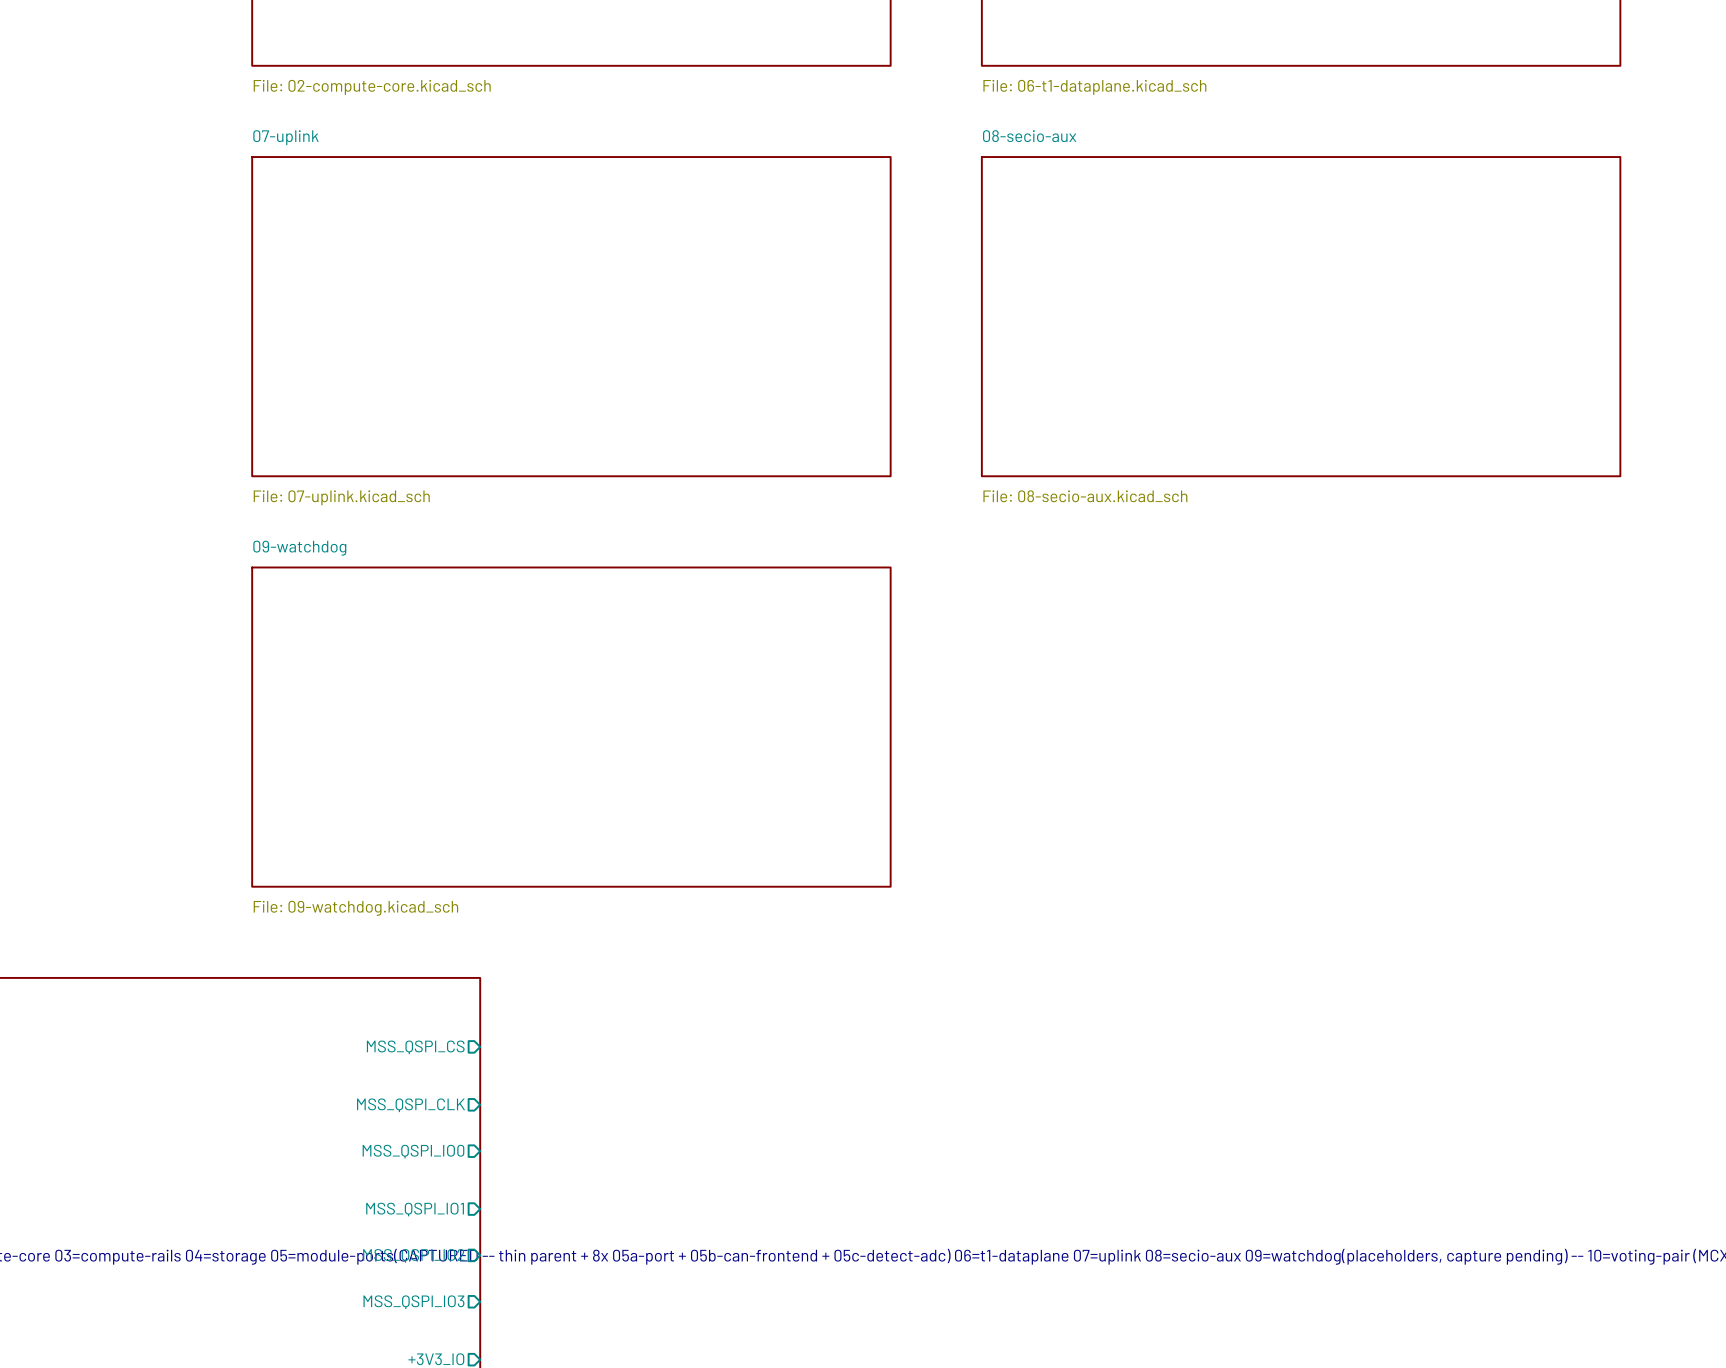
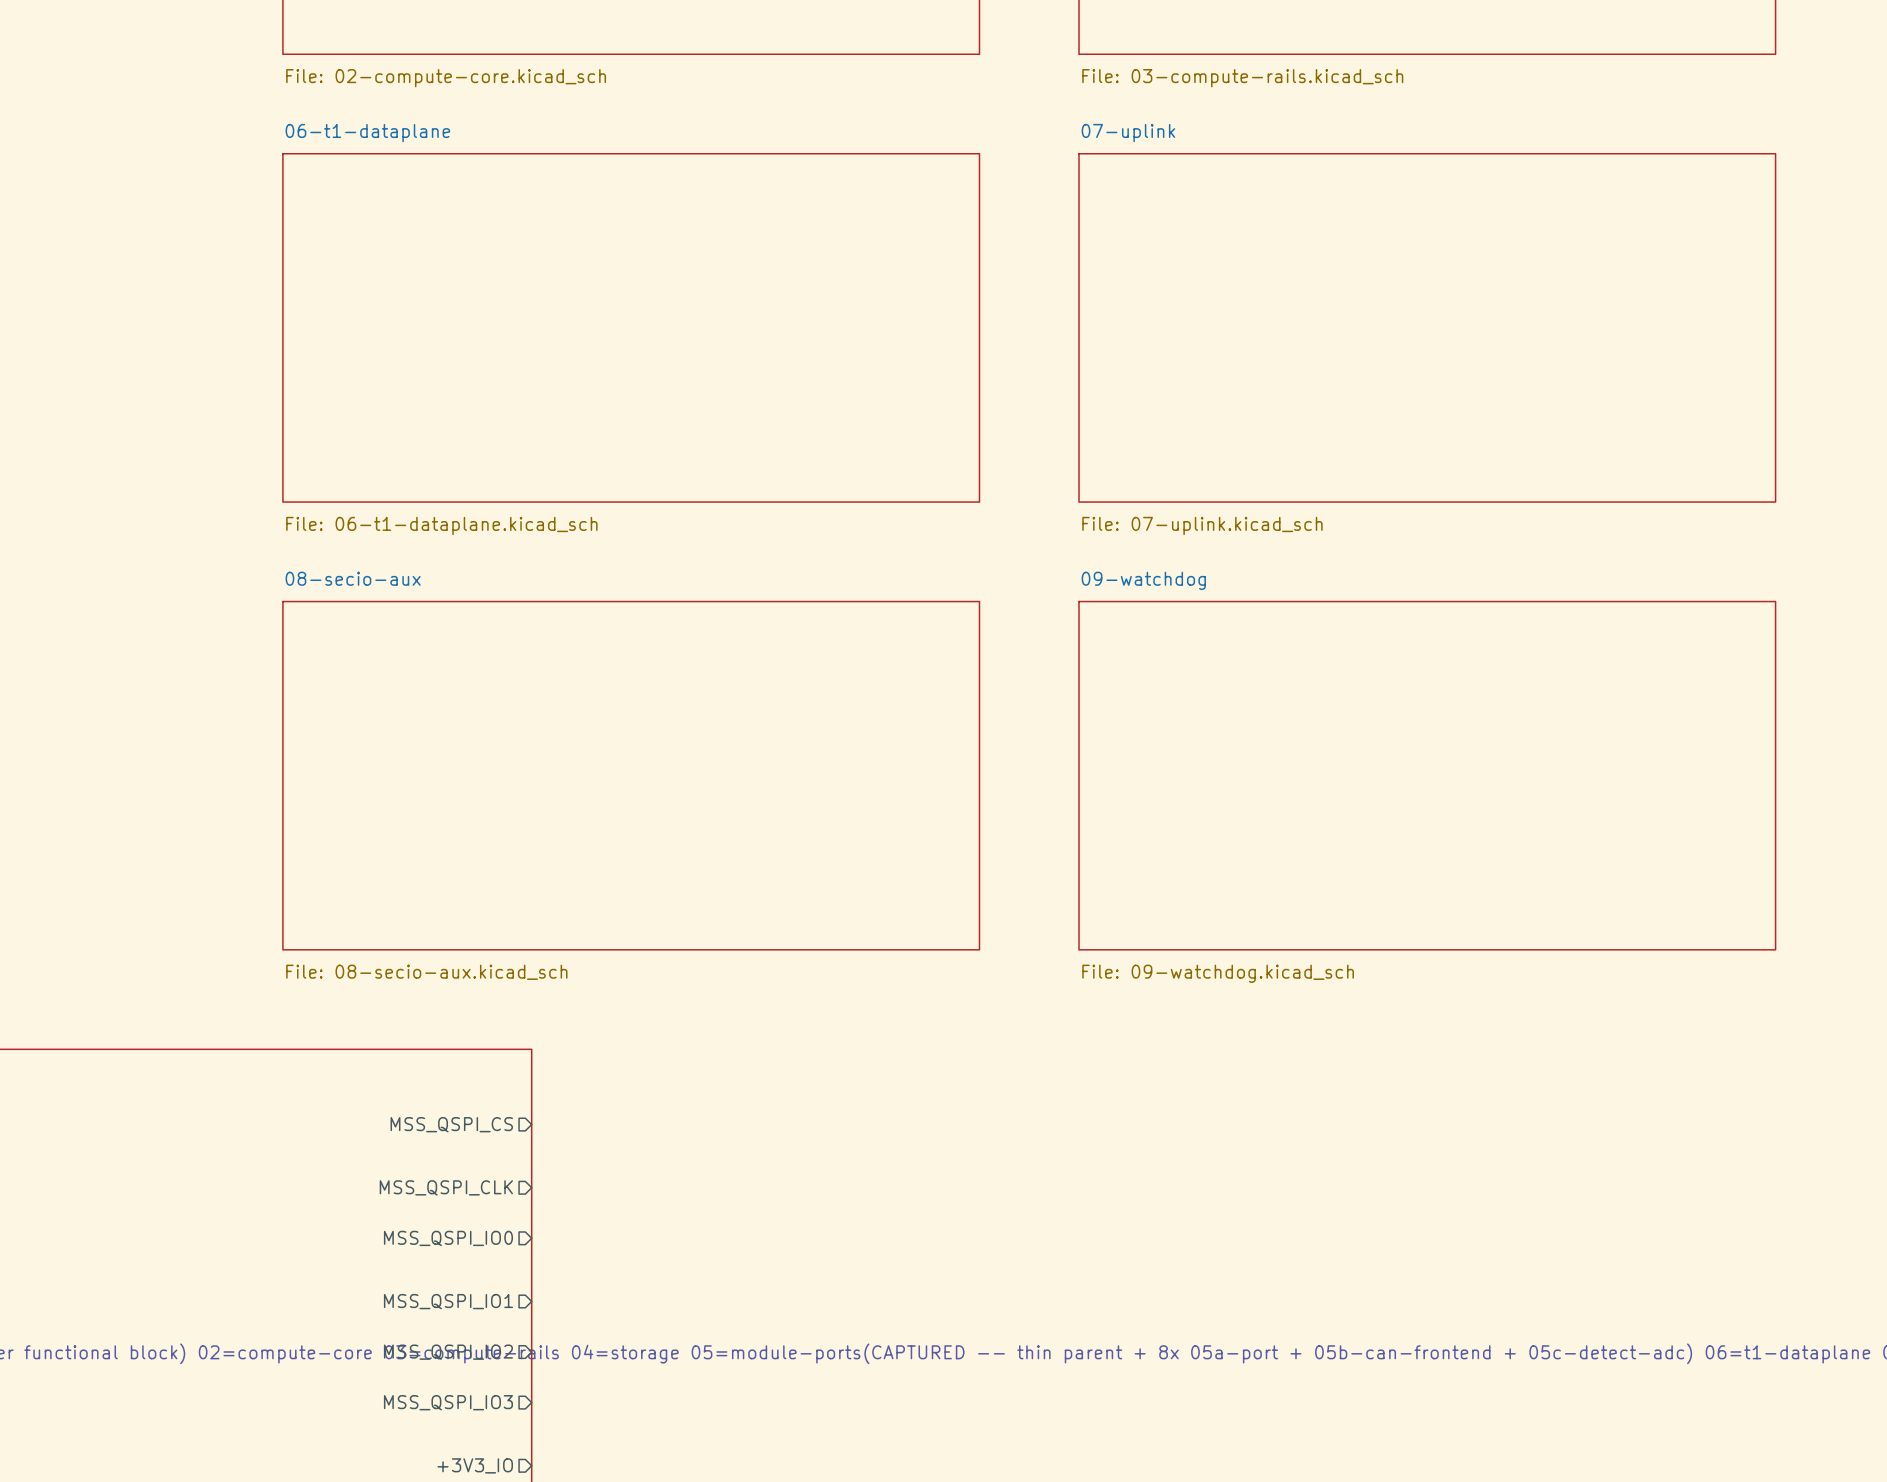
sheet value: File: 06-t1-dataplane.kicad_sch (1094, 87) -> File: 03-compute-rails.kicad_sch (1242, 78)
sheet 08-secio-aux name: 08-secio-aux (1029, 136) -> 07-uplink (1128, 133)
sheet 07-uplink name: 07-uplink (285, 137) -> 06-t1-dataplane (367, 133)
sheet 08-secio-aux value: File: 08-secio-aux.kicad_sch (1085, 496) -> File: 07-uplink.kicad_sch (1202, 525)
sheet 07-uplink value: File: 07-uplink.kicad_sch (341, 497) -> File: 06-t1-dataplane.kicad_sch (441, 525)
sheet 09-watchdog name: 09-watchdog (299, 548) -> 08-secio-aux (353, 578)
sheet 09-watchdog: none -> File: 09-watchdog.kicad_sch (1427, 775)
sheet 09-watchdog value: File: 09-watchdog.kicad_sch (355, 908) -> File: 08-secio-aux.kicad_sch (426, 972)

